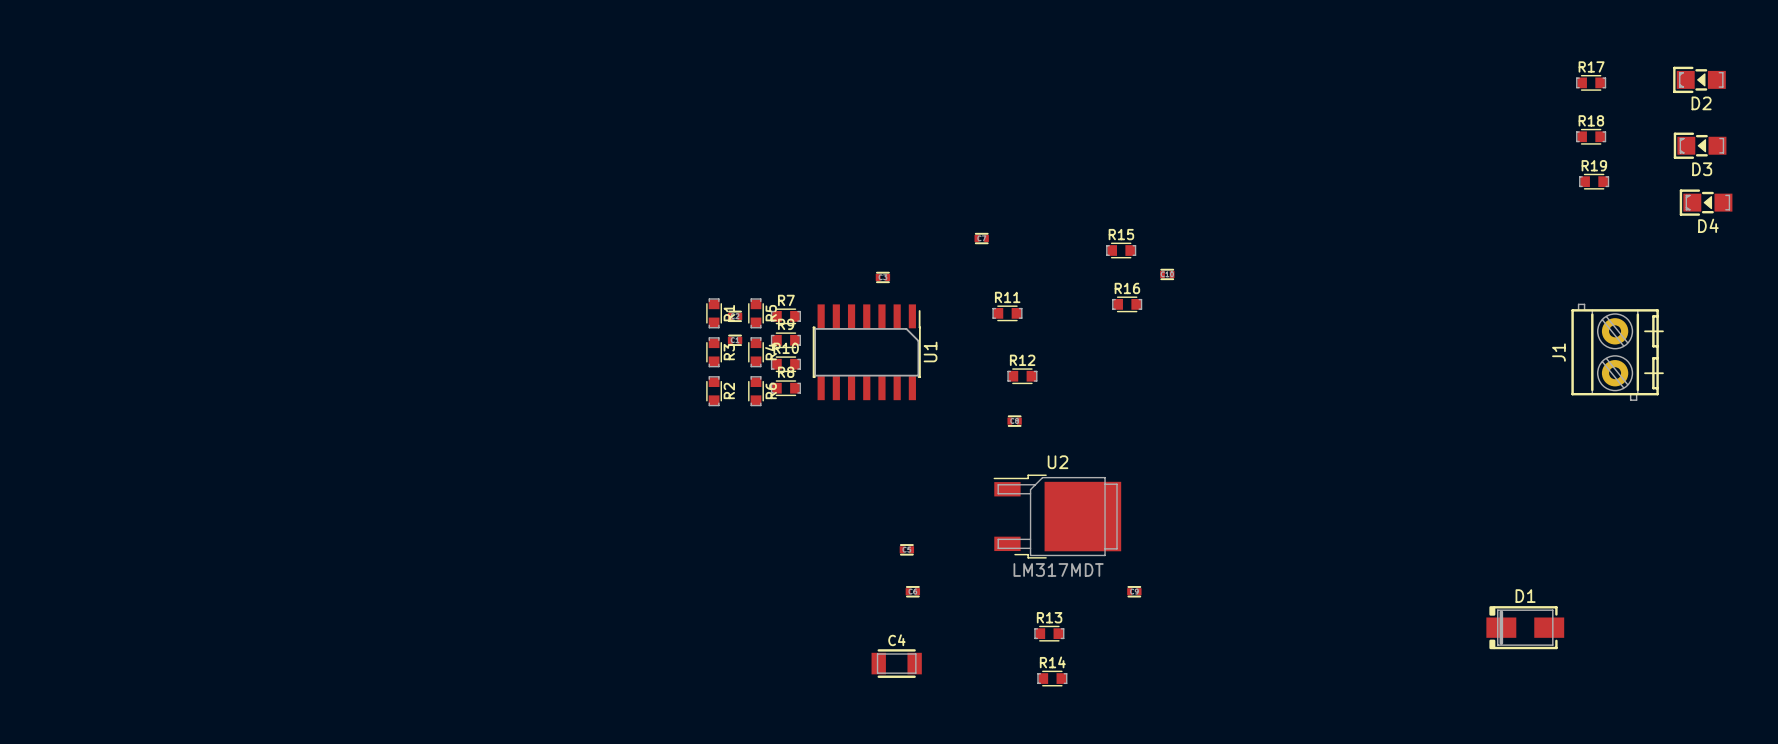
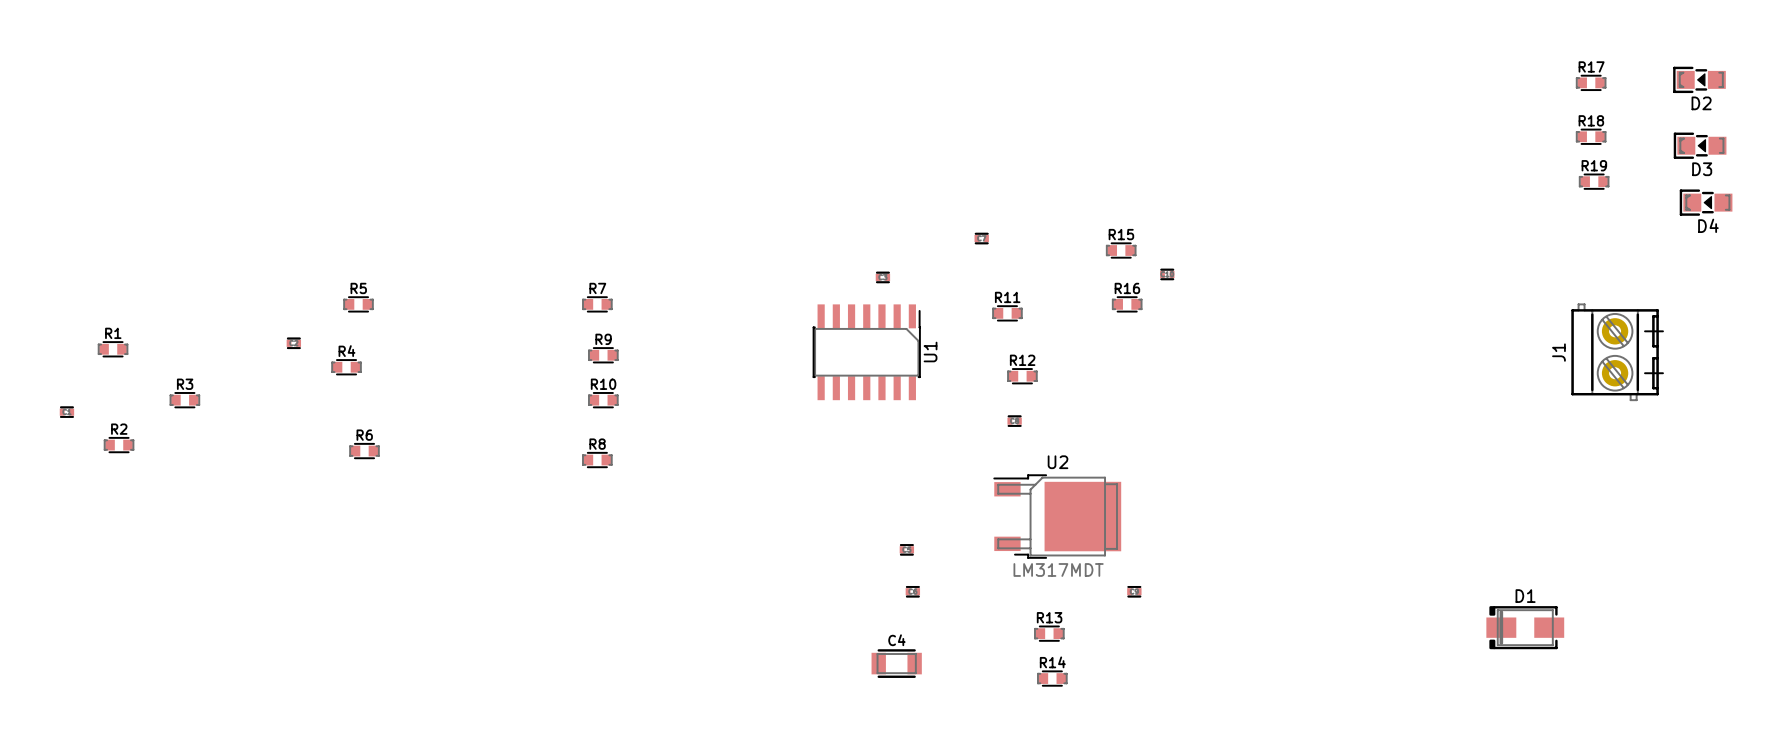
R1 rotation: 0° (714, 313) -> 90° clockwise (113, 349)
R1 position: (714, 313) -> (113, 349)
R5 rotation: 0° (756, 313) -> 90° clockwise (358, 304)
R5 position: (756, 313) -> (358, 304)
part position: (735, 316) -> (293, 343)
R7 position: (785, 316) -> (597, 304)
part position: (735, 340) -> (66, 412)
R9 position: (785, 340) -> (603, 355)
R3 rotation: 0° (714, 352) -> 90° clockwise (184, 400)
R3 position: (714, 352) -> (184, 400)
R4 rotation: 0° (756, 352) -> 90° clockwise (346, 367)
R4 position: (756, 352) -> (346, 367)
R10 position: (785, 364) -> (603, 400)
R8 position: (785, 388) -> (597, 460)
R2 rotation: 0° (714, 391) -> 90° clockwise (119, 445)
R2 position: (714, 391) -> (119, 445)
R6 rotation: 0° (756, 391) -> 90° clockwise (364, 451)
R6 position: (756, 391) -> (364, 451)

